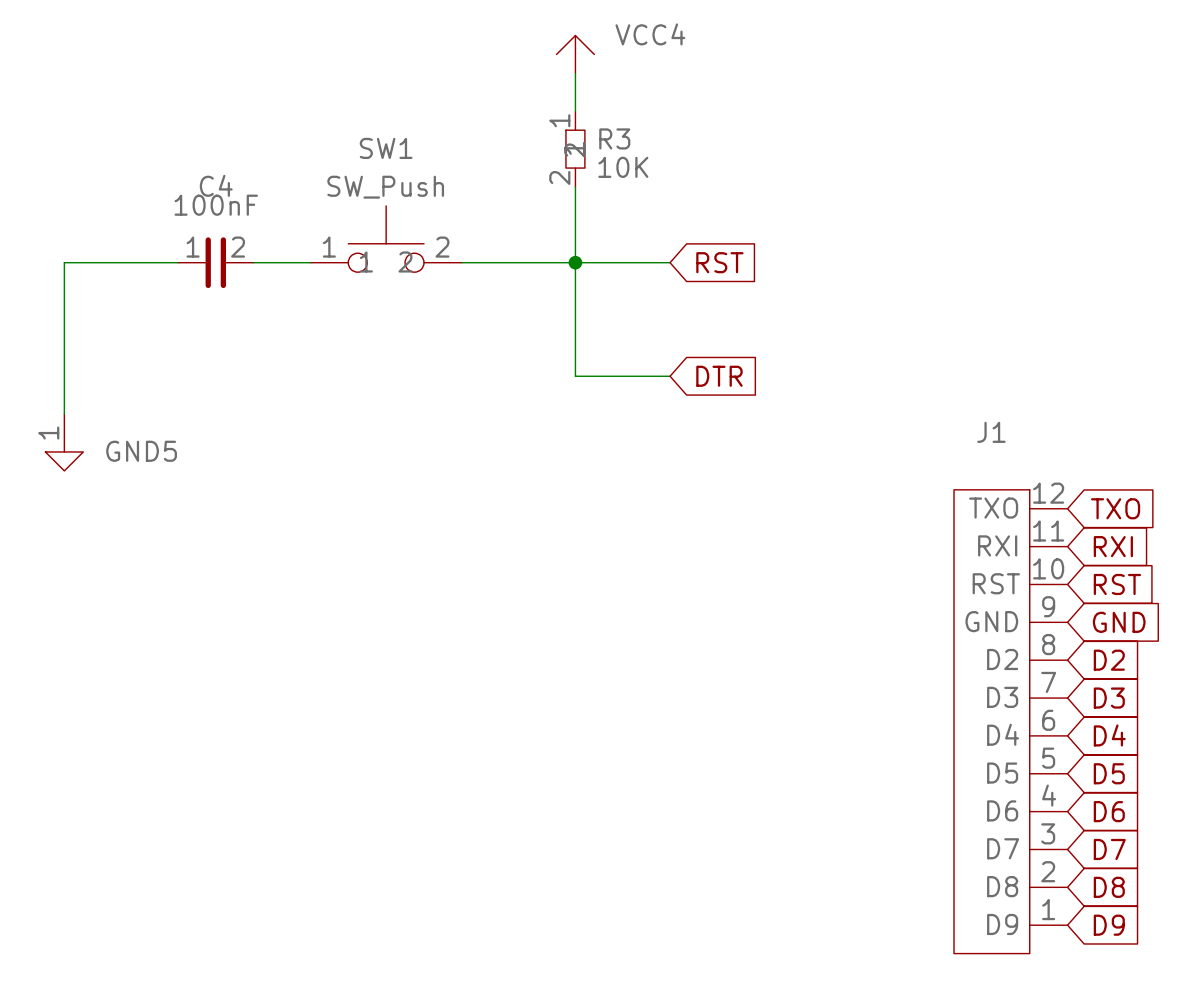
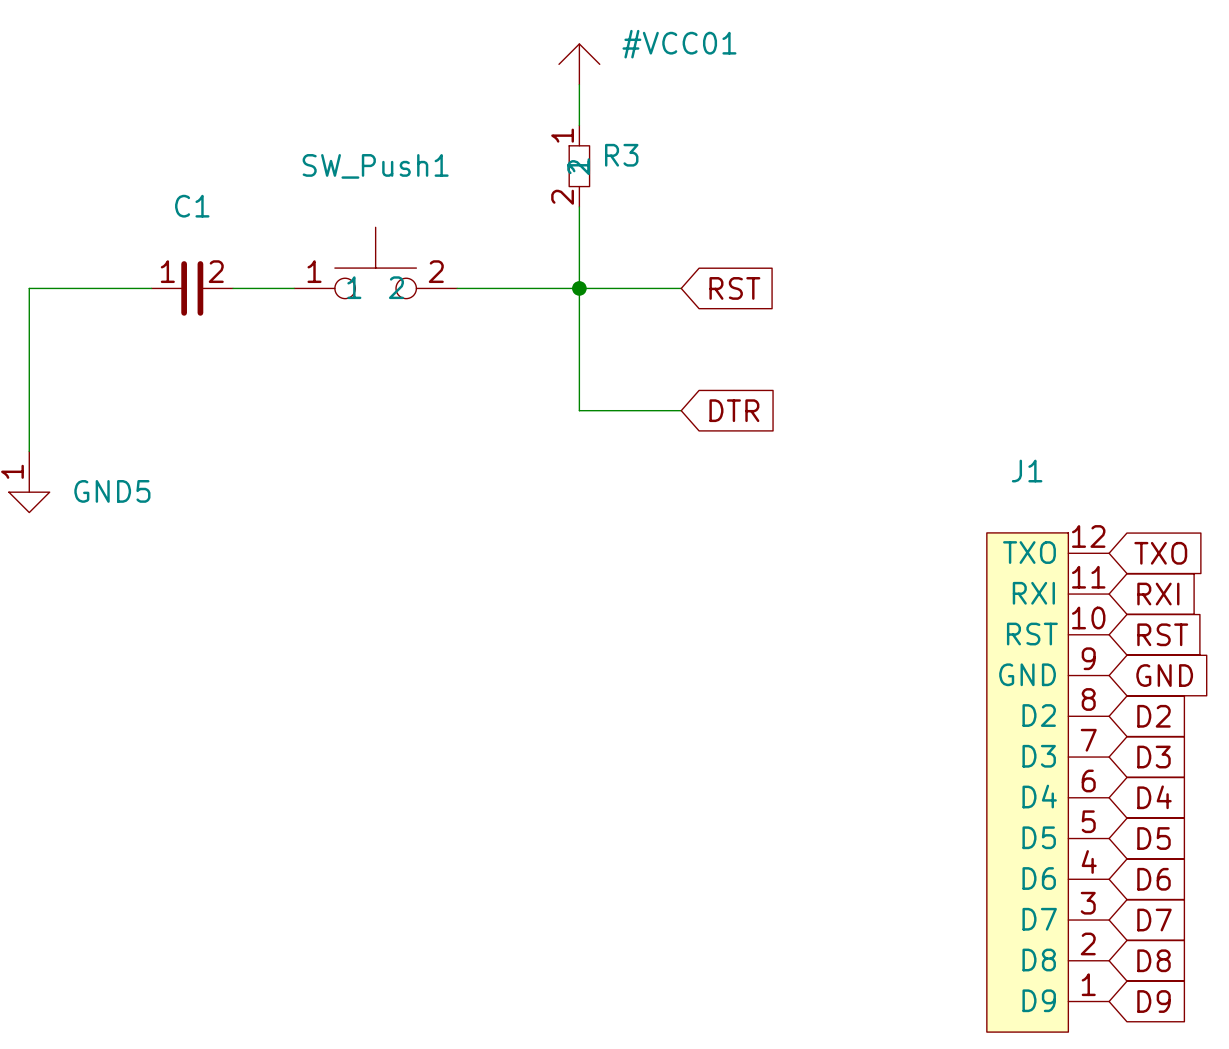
VCC4: (575, 54) -> none
#VCC01: none -> (579, 64)
SW1 name: SW1 (386, 148) -> SW_Push1 (375, 166)
R3 value: 10K (623, 167) -> none
C4 name: C4 (216, 185) -> C1 (192, 206)
SW1 value: SW_Push (385, 187) -> none
C4 value: 100nF (216, 205) -> none

